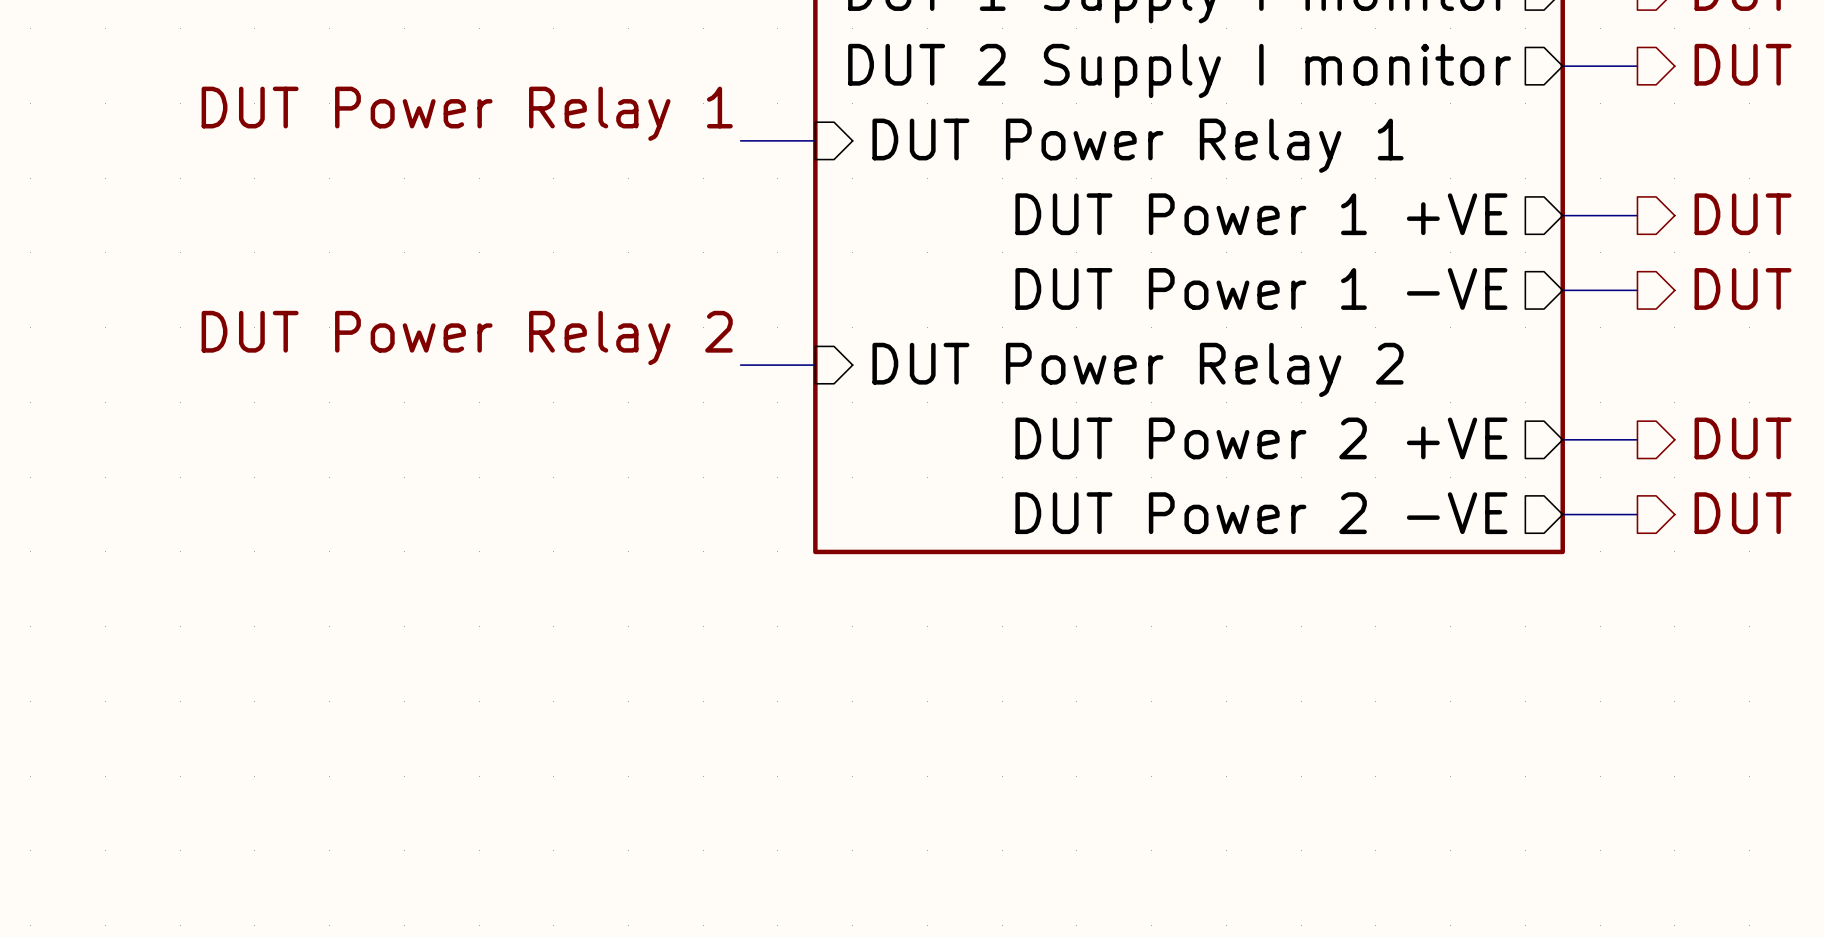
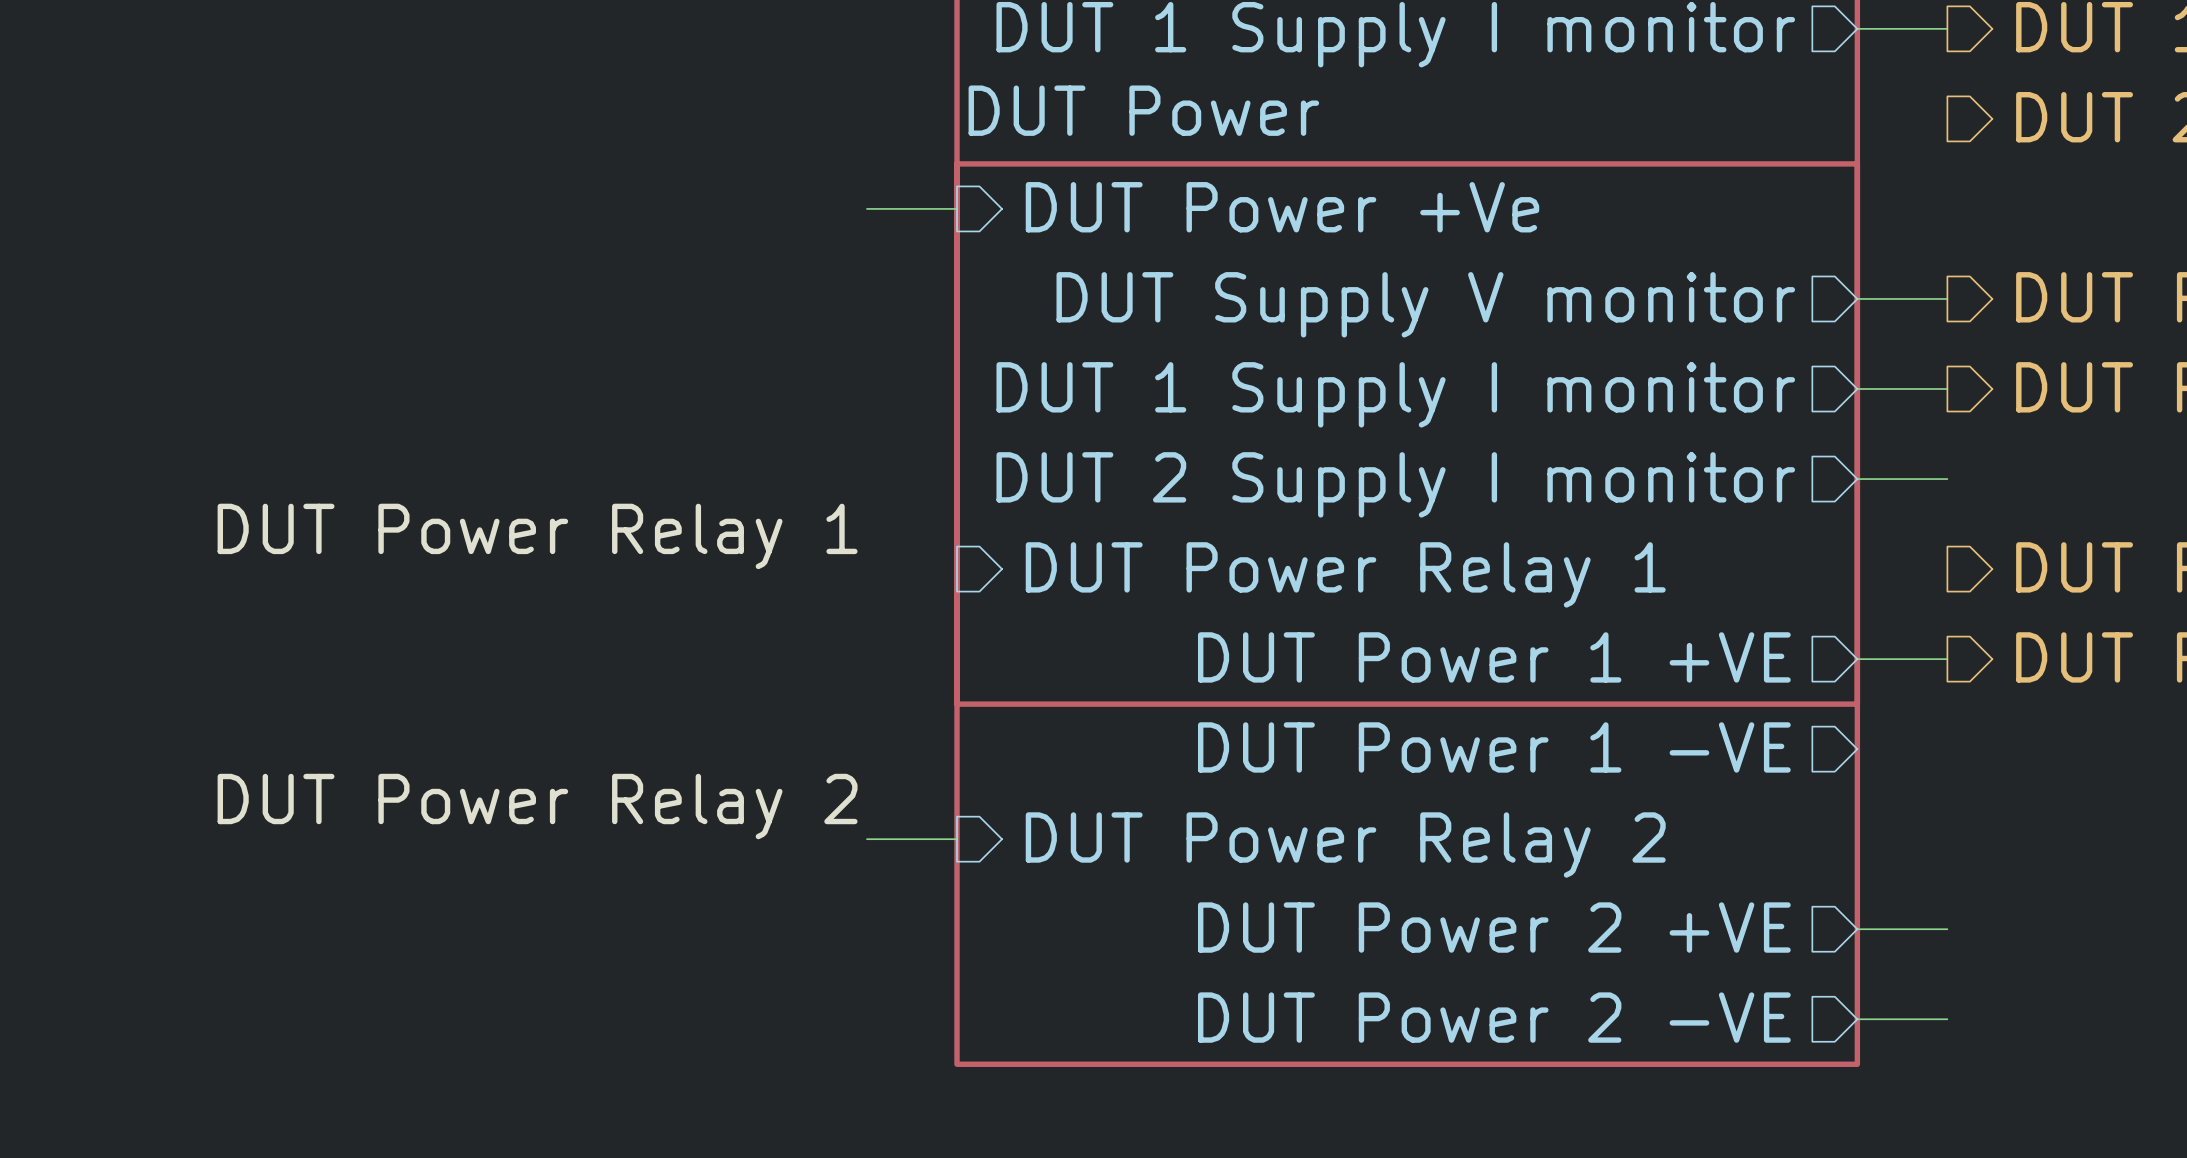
wire: (1562, 66) (1637, 66) -> (1857, 479) (1947, 479)
sheet pin position: DUT 2 Supply I monitor (1179, 70) -> DUT 2 Supply I monitor (1395, 484)
label position: DUT Power Relay 1 (467, 113) -> DUT Power Relay 1 (537, 536)
sheet pin: DUT Power Relay 1 (1138, 145) -> DUT Power +Ve (1282, 207)
sheet pin: DUT Power 1 +VE (1261, 214) -> DUT Supply V monitor (1425, 304)
sheet pin: DUT Power 1 -VE (1261, 288) -> DUT 1 Supply I monitor (1395, 394)
label position: DUT Power Relay 2 (467, 337) -> DUT Power Relay 2 (537, 806)
wire: (740, 365) (815, 365) -> (866, 839) (957, 839)
sheet pin position: DUT Power Relay 2 (1138, 369) -> DUT Power Relay 2 (1345, 845)
sheet pin position: DUT Power 2 +VE (1261, 438) -> DUT Power 2 +VE (1494, 927)
wire: (1562, 439) (1637, 439) -> (1857, 929) (1947, 929)
sheet pin: none -> DUT Power Relay 1 (1345, 574)
sheet DUT Power: none -> (1407, 614)
sheet pin: DUT Power 2 -VE (1261, 513) -> DUT Power 1 +VE (1494, 657)
sheet pin: none -> DUT Power 1 -VE (1494, 747)
sheet pin: none -> DUT Power 2 -VE (1494, 1017)
wire: none -> (1857, 1019) (1947, 1019)

